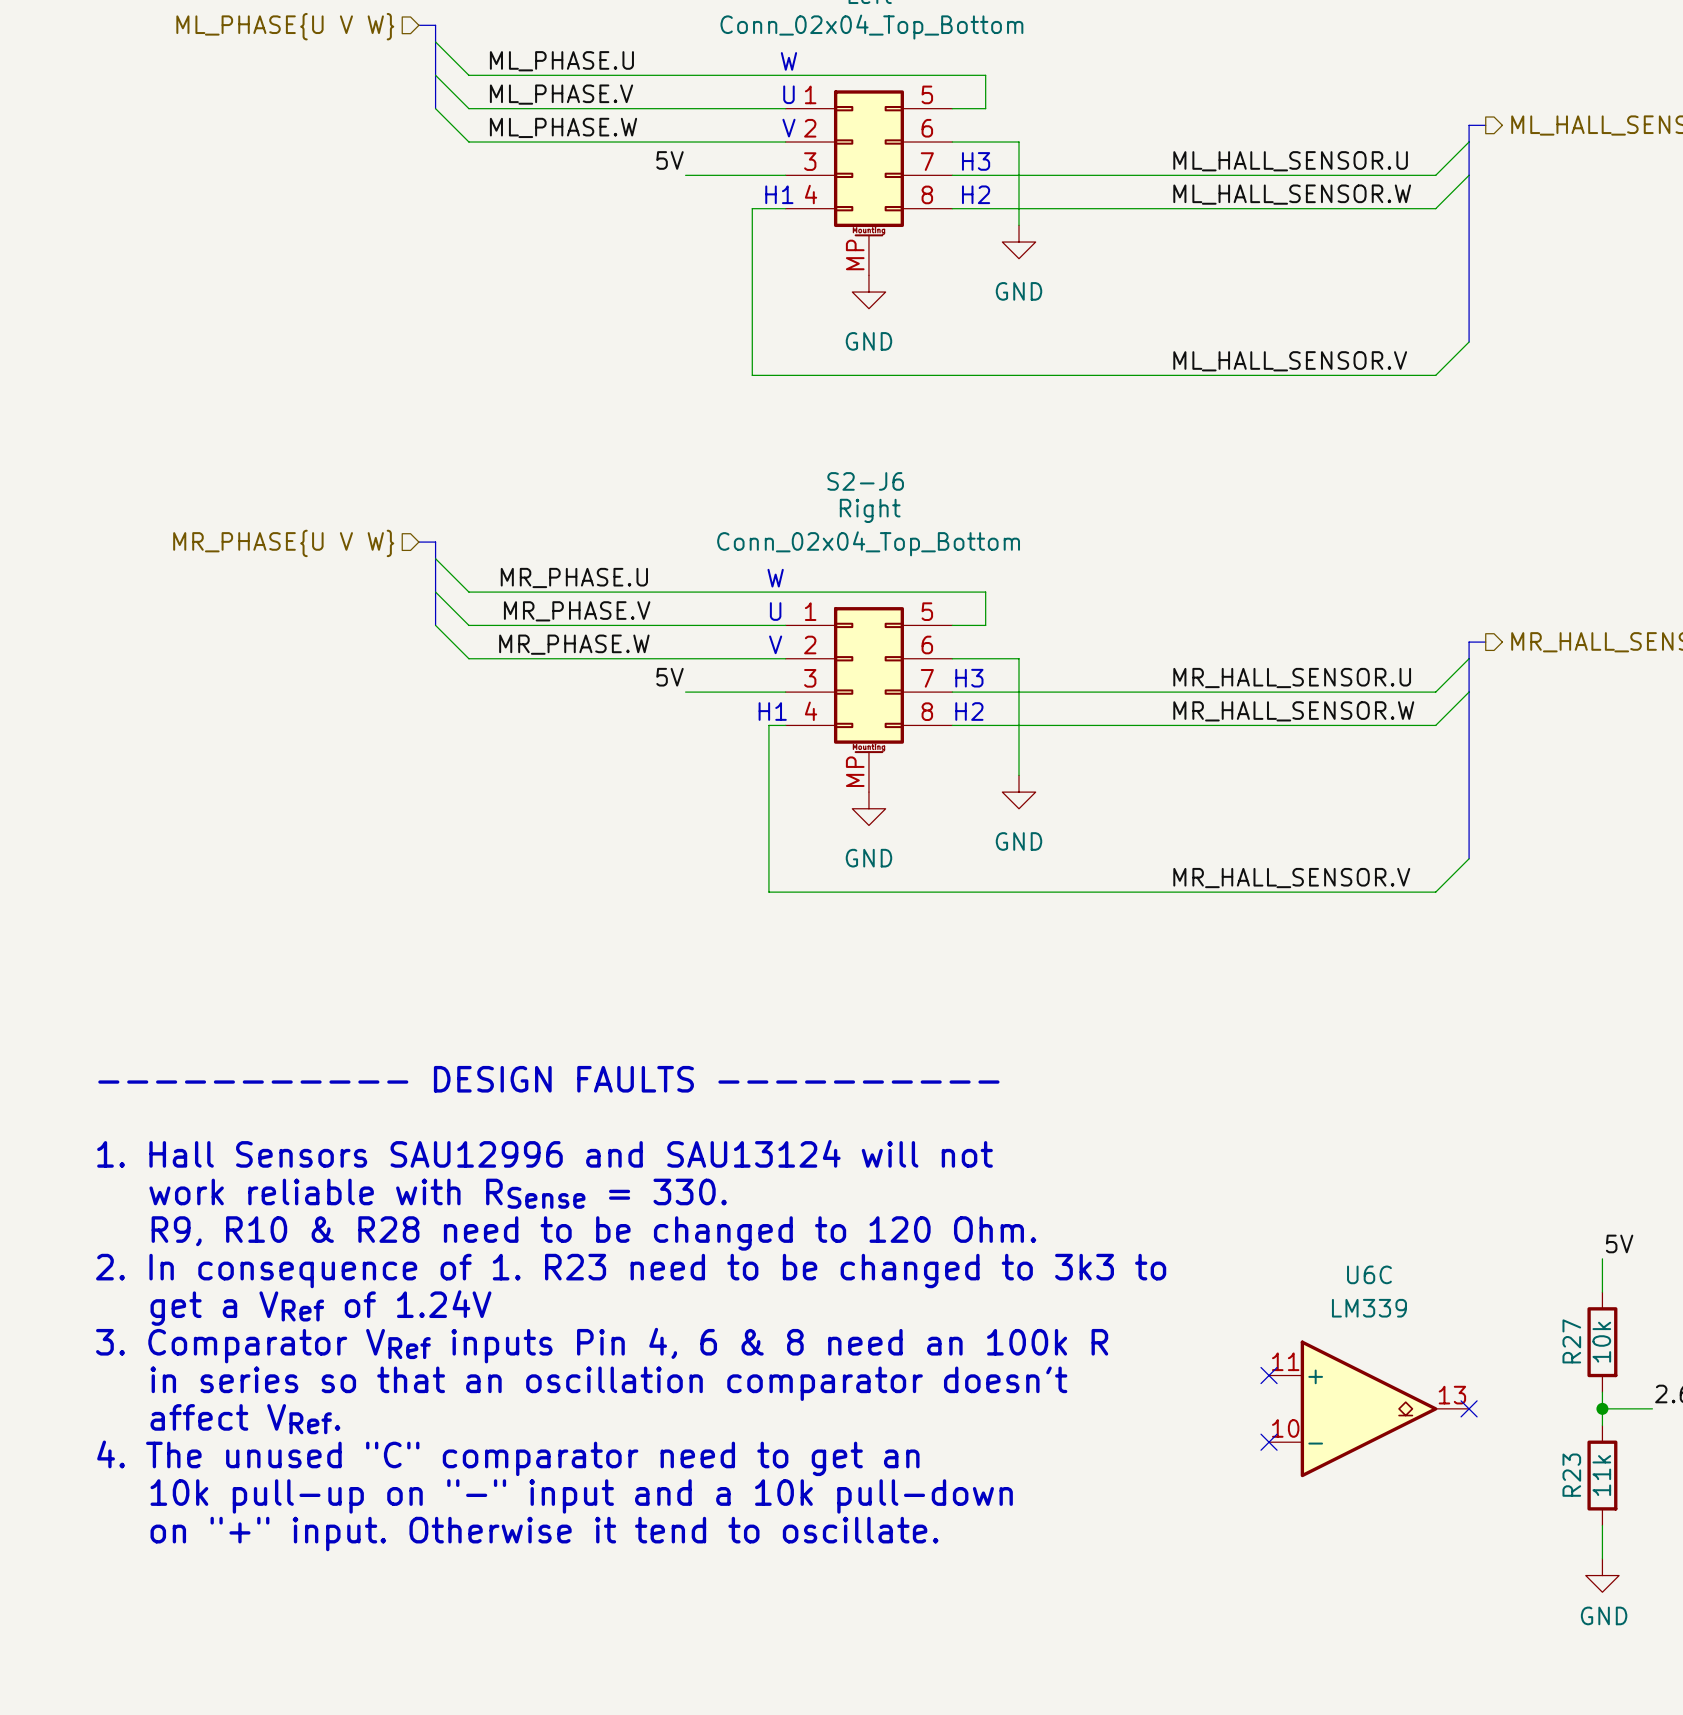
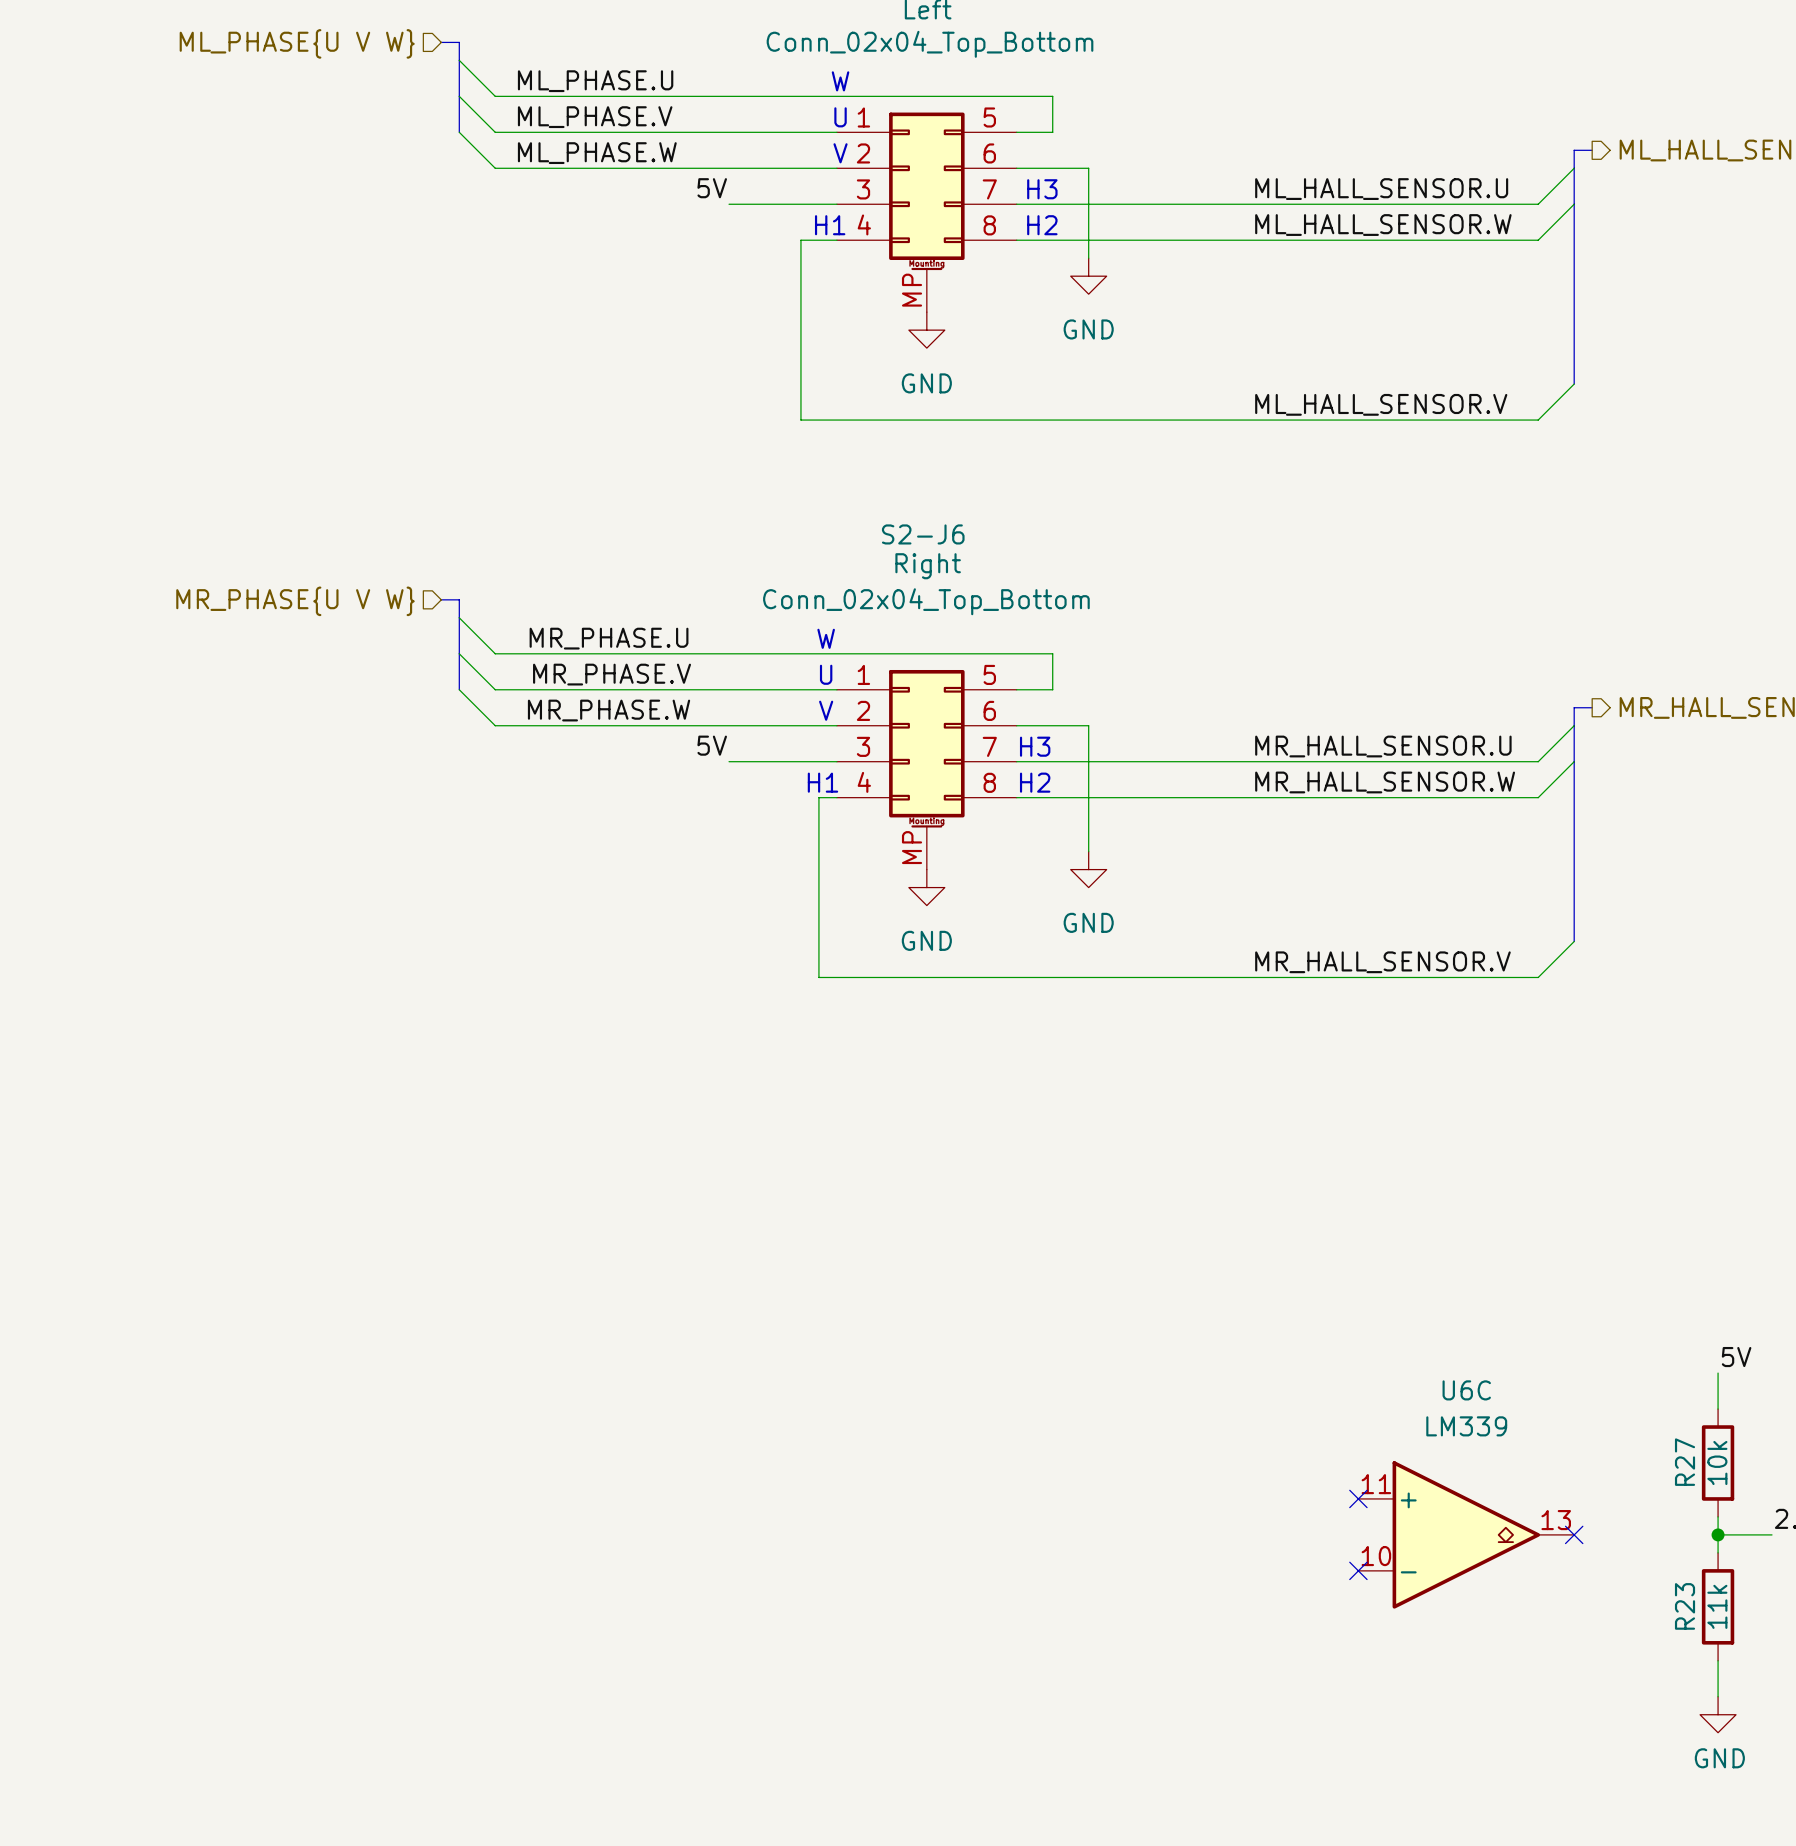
text: ----------- DESIGN FAULTS ---------- (548, 1079) -> none
text: 1. Hall Sensors SAU12996 and SAU13124 will not (545, 1153) -> none
text: work reliable with RSense = 330. (438, 1193) -> none
text: R9, R10 & R28 need to be changed to 120 Ohm. (593, 1233) -> none
text: 2. In consequence of 1. R23 need to be changed to 3k3 to (631, 1271) -> none
text: get a VRef of 1.24V (320, 1308) -> none
text: 3. Comparator VRef inputs Pin 4, 6 & 8 need an 100k R (602, 1345) -> none
text: in series so that an oscillation comparator doesn't (608, 1383) -> none
text: affect VRef. (245, 1419) -> none
text: 4. The unused "C" comparator need to get an (508, 1458) -> none
text: 10k pull-up on "-" input and a 10k pull-down (581, 1496) -> none
text: on "+" input. Otherwise it tend to oscillate. (544, 1534) -> none

